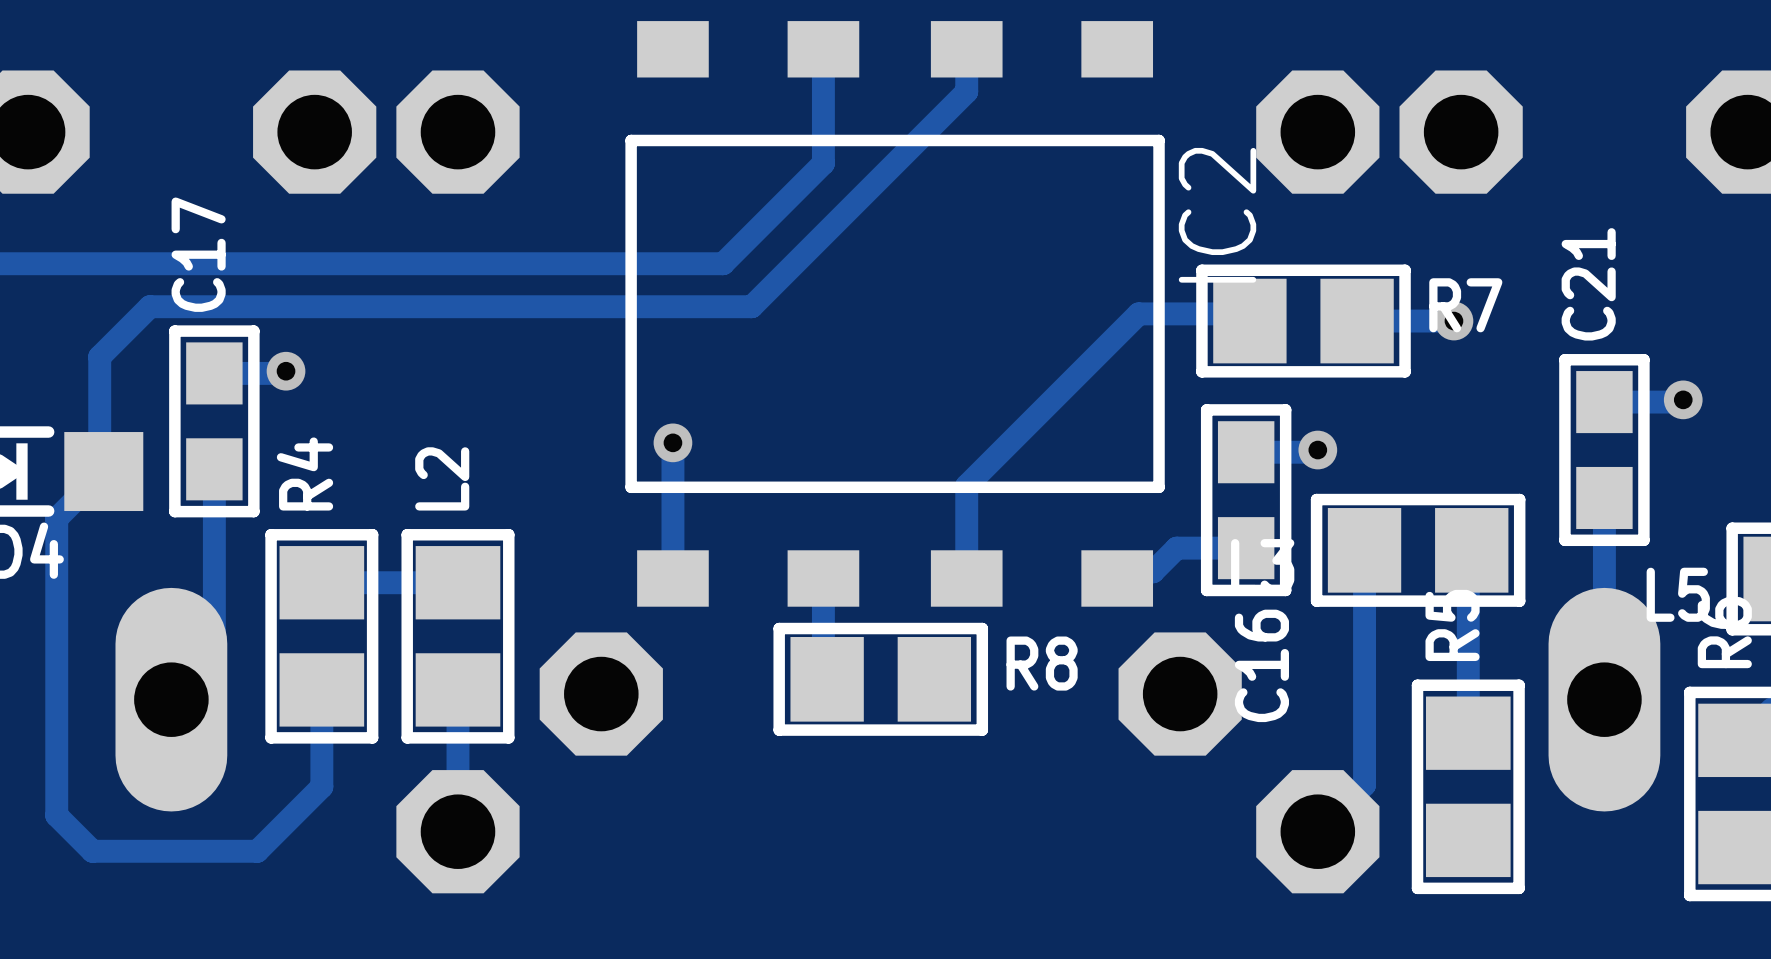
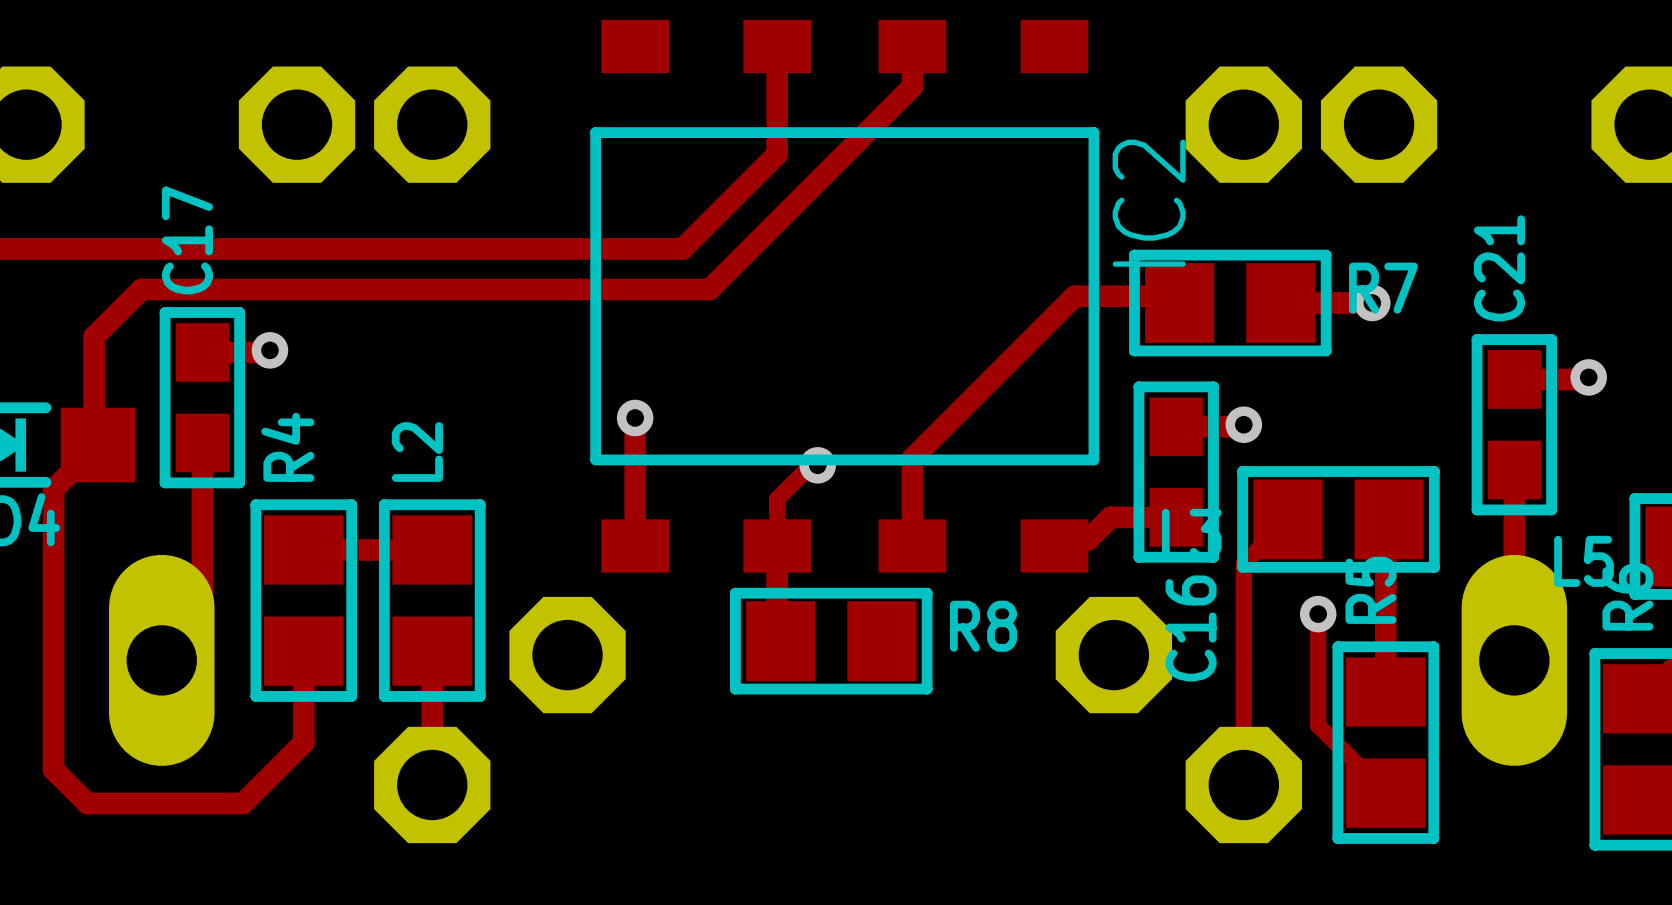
track: none -> (817, 465) (810, 465) (777, 499) (777, 546)
via: none -> (817, 465)
track: (1364, 550) (1364, 784) (1317, 831) -> (1287, 519) (1243, 563) (1243, 784)
track: none -> (1318, 614) (1318, 725) (1385, 793)
via: none -> (1318, 614)

